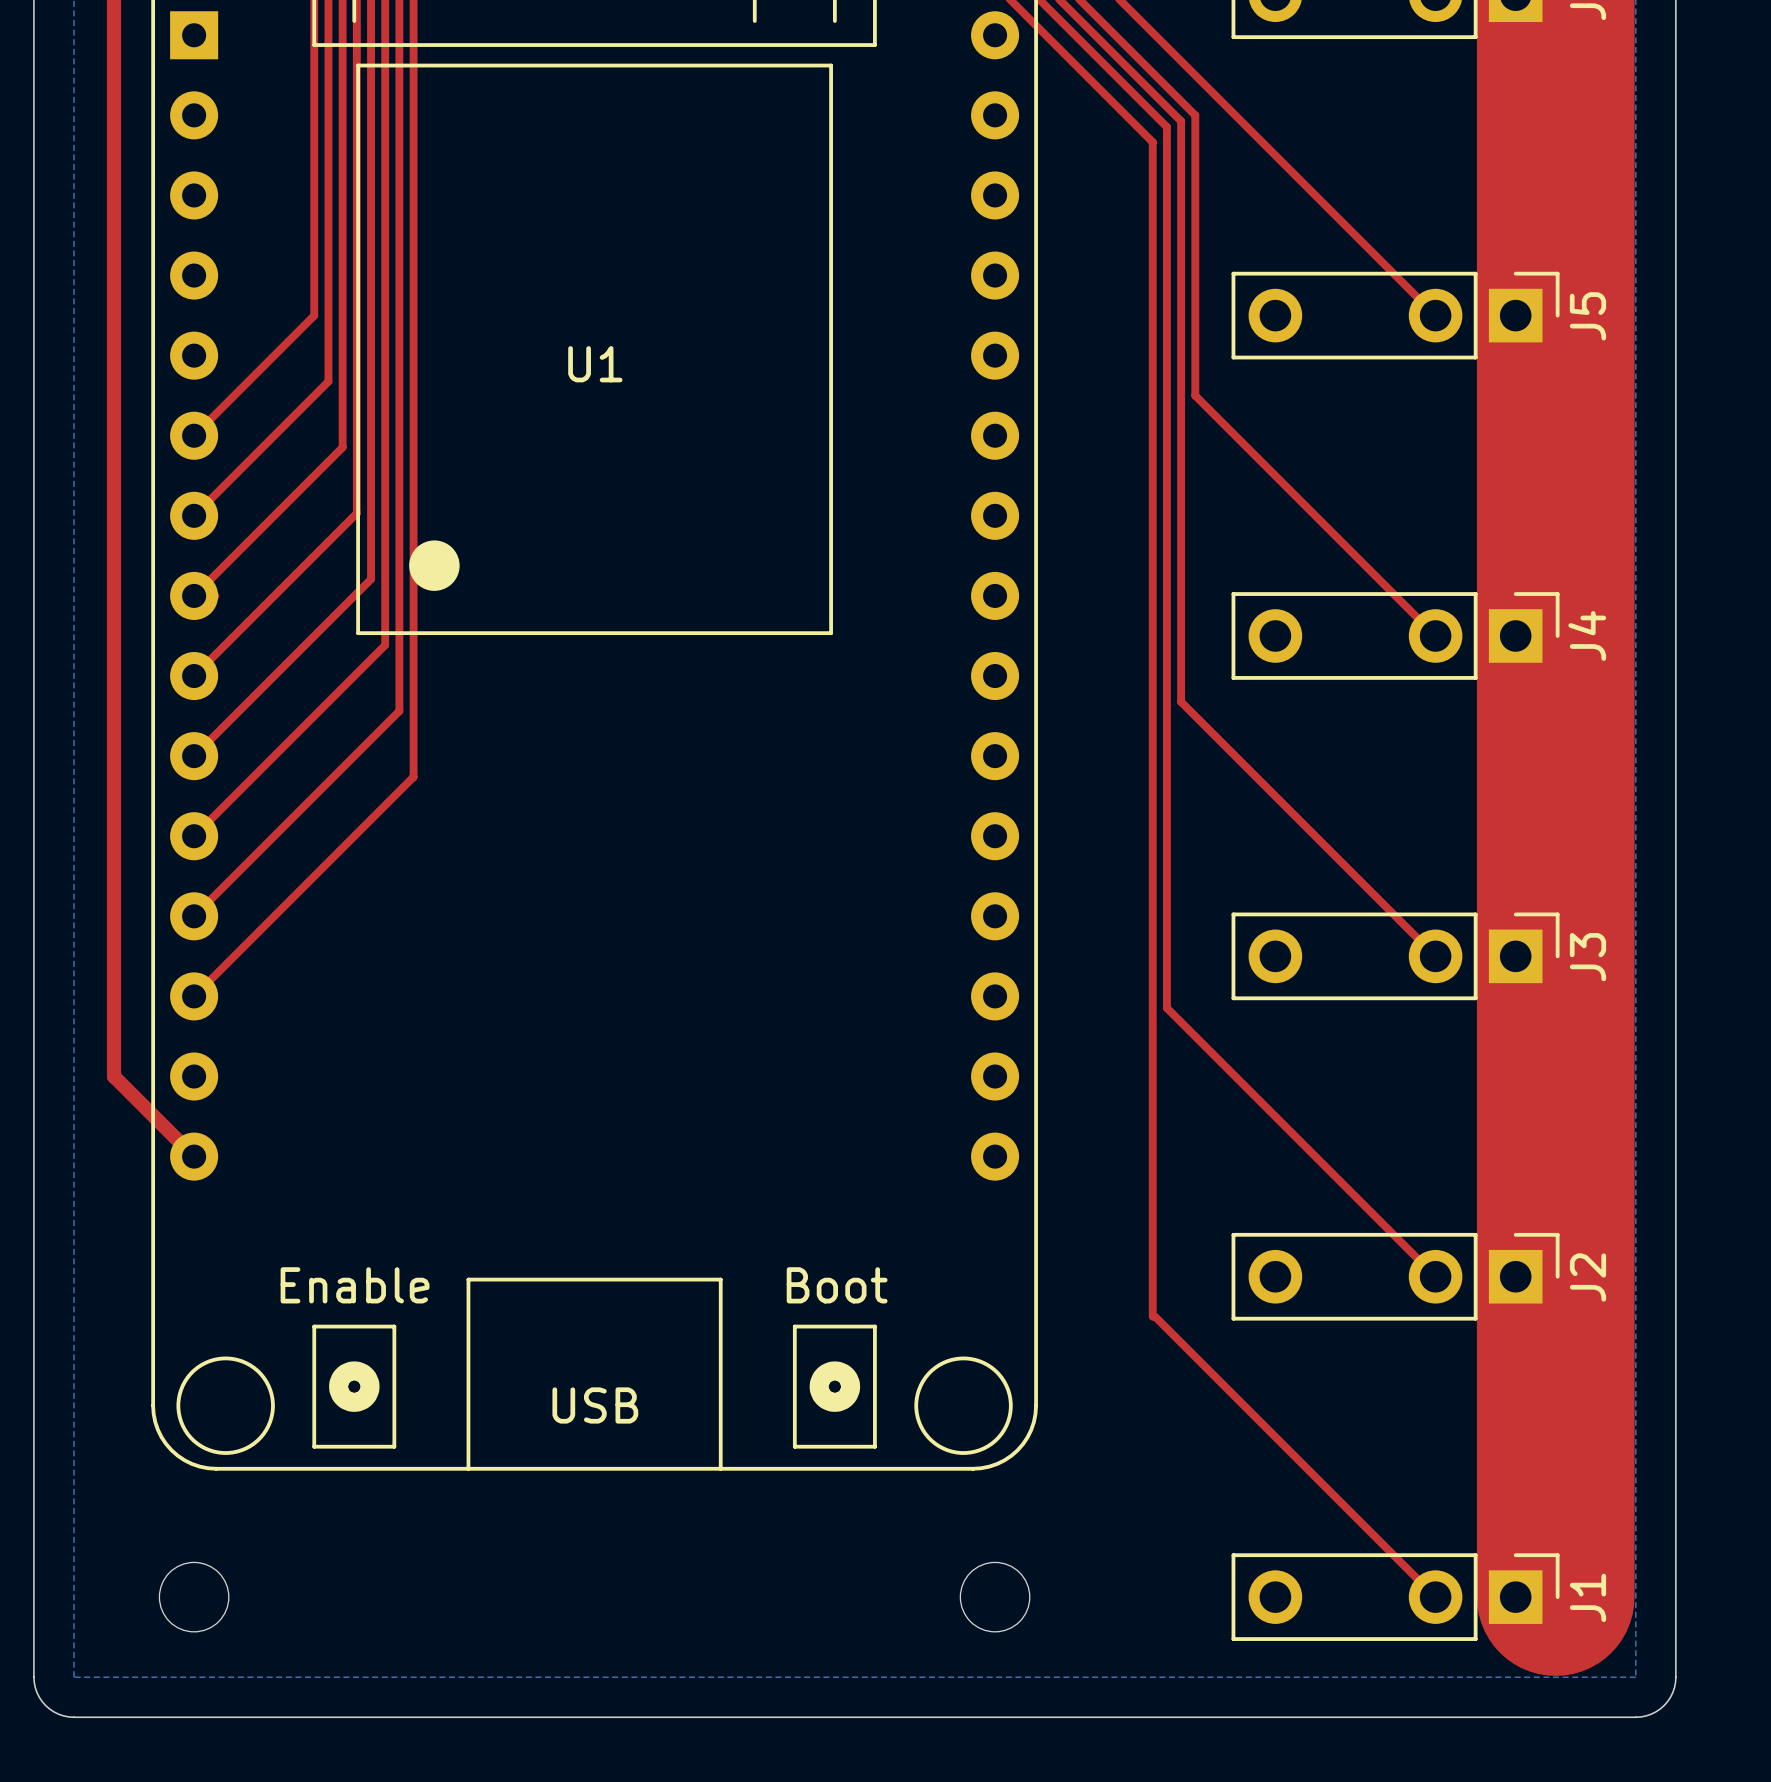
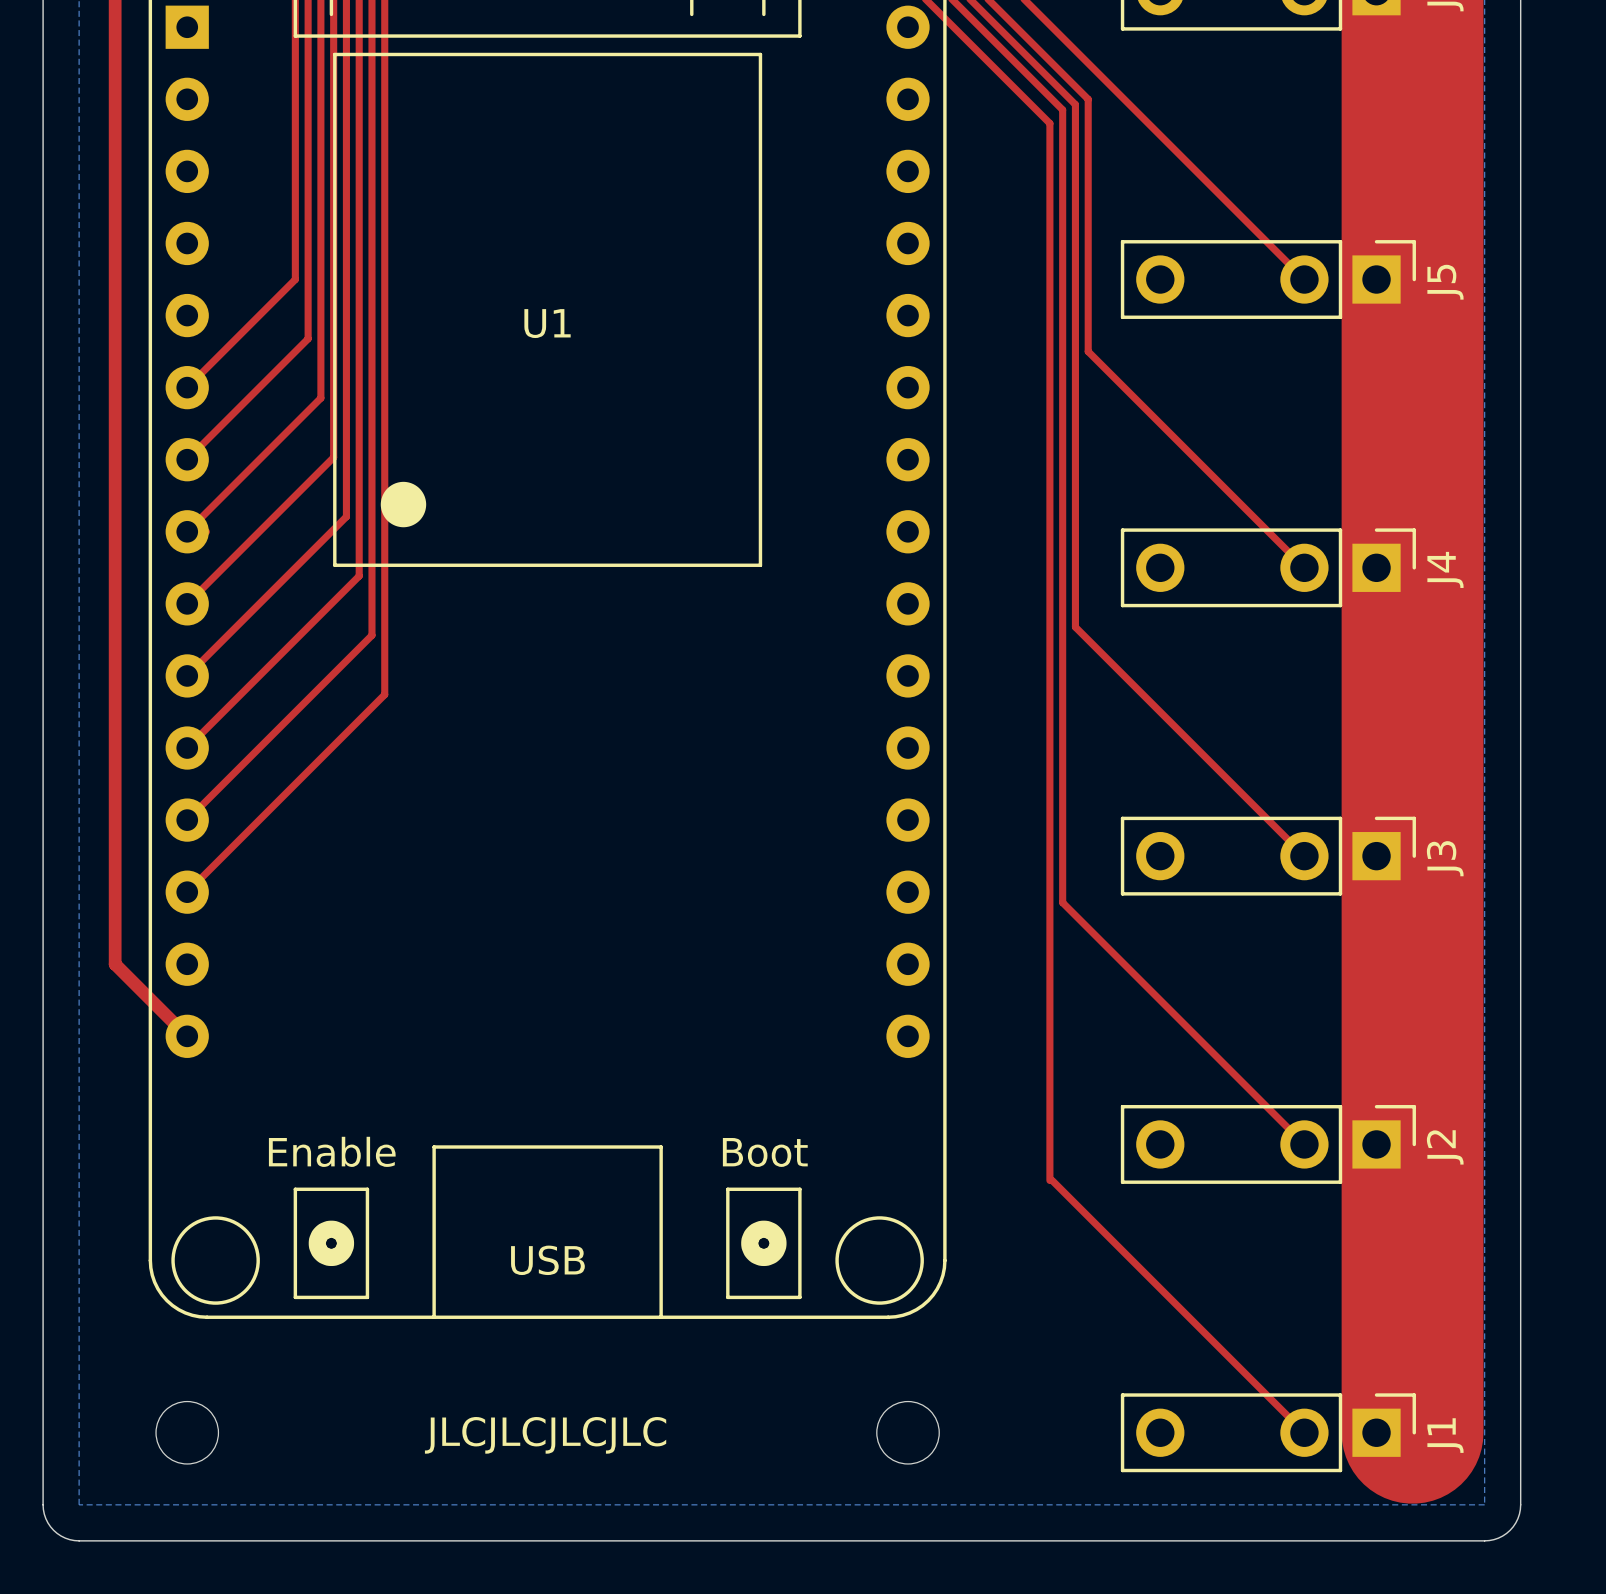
text: none -> JLCJLCJLCJLC (545, 1435)

